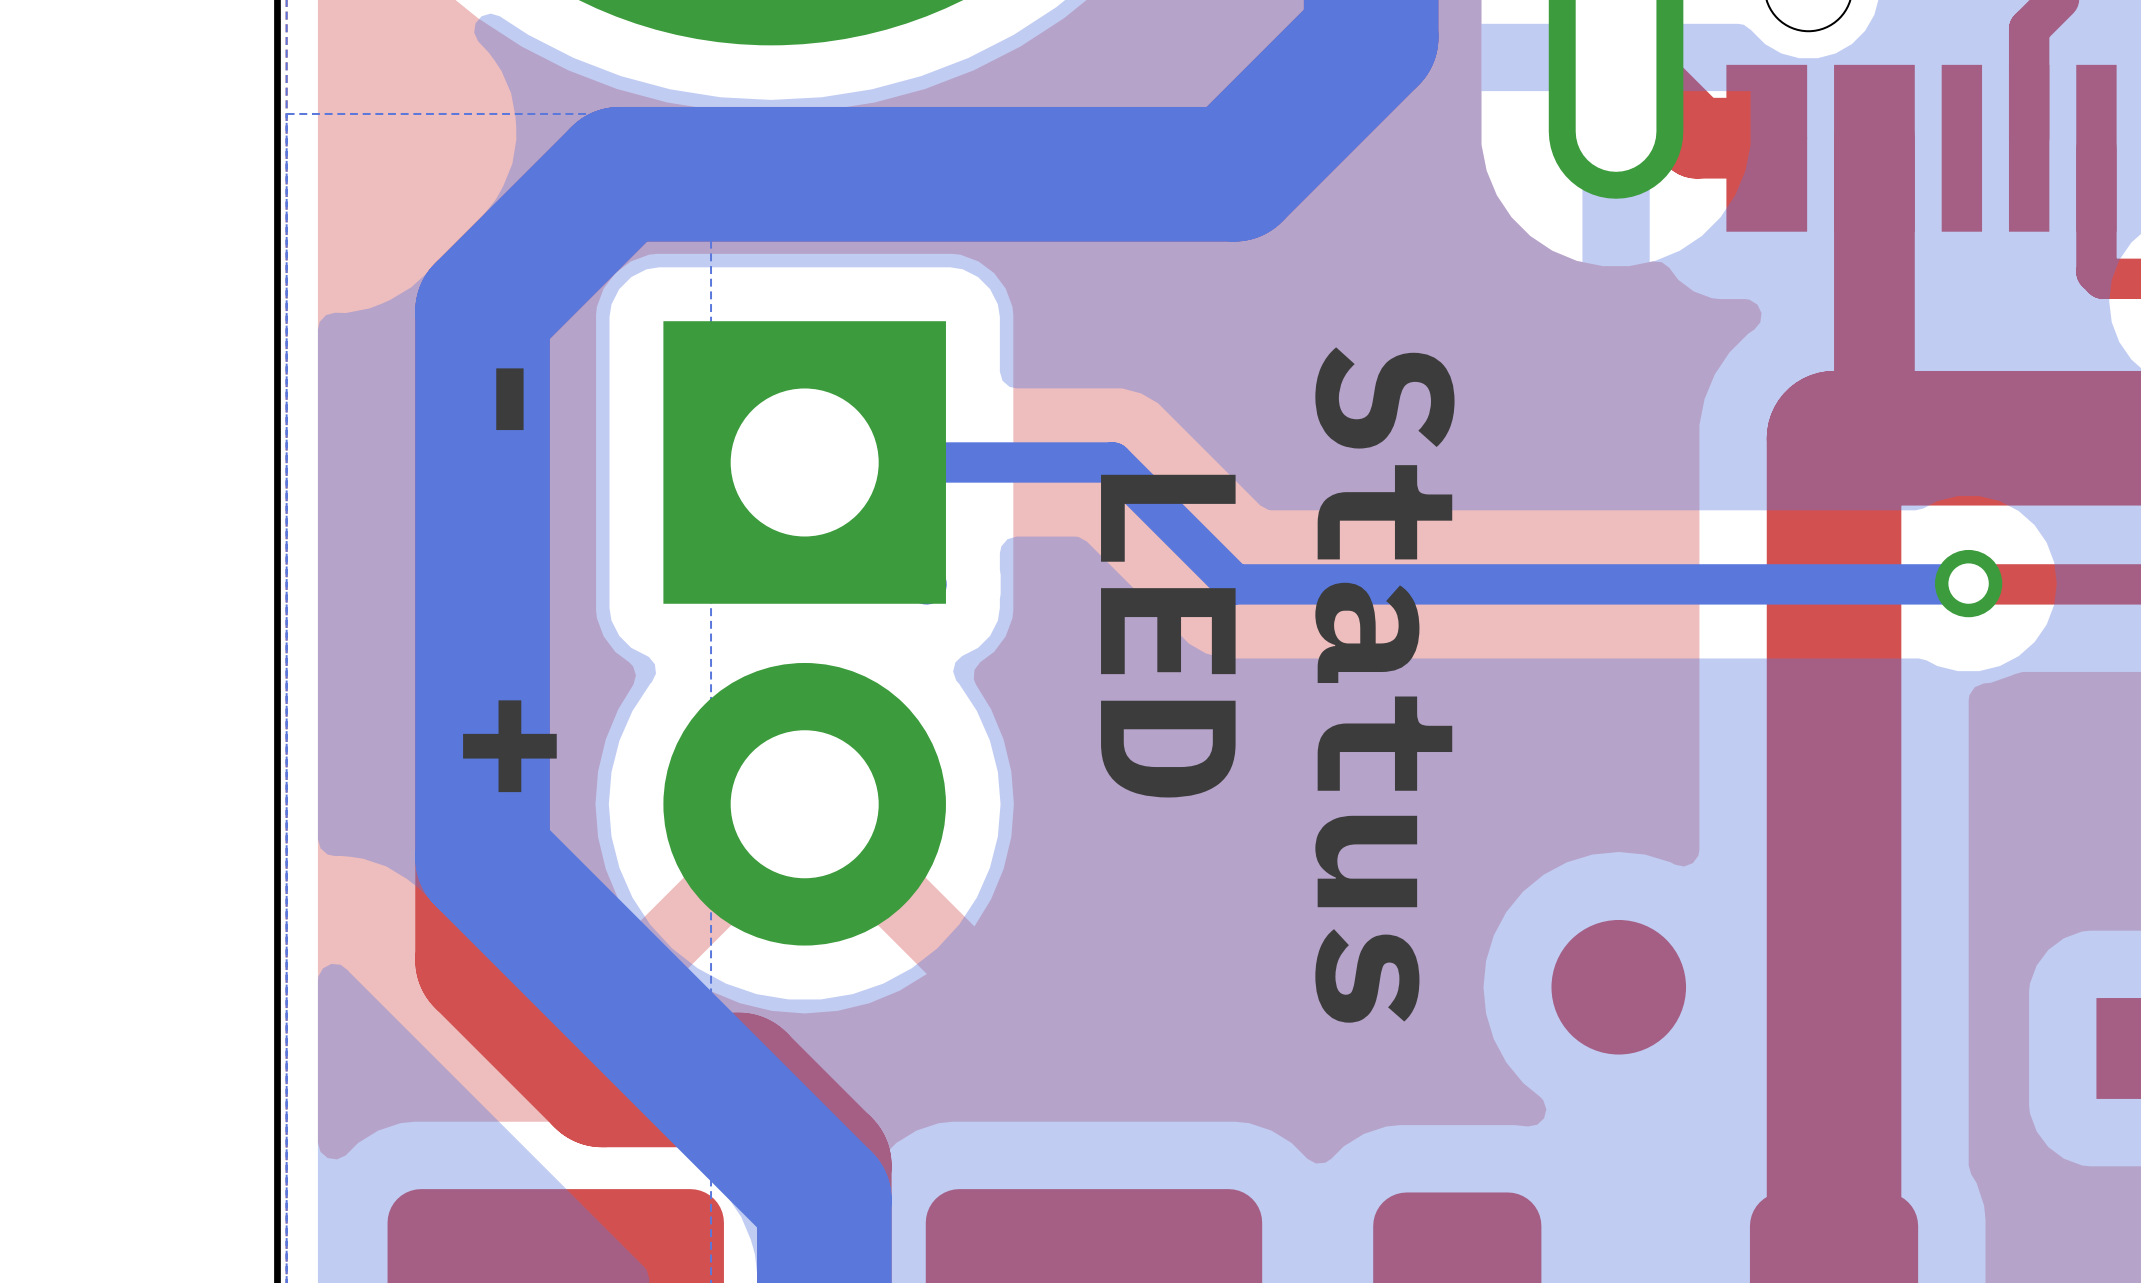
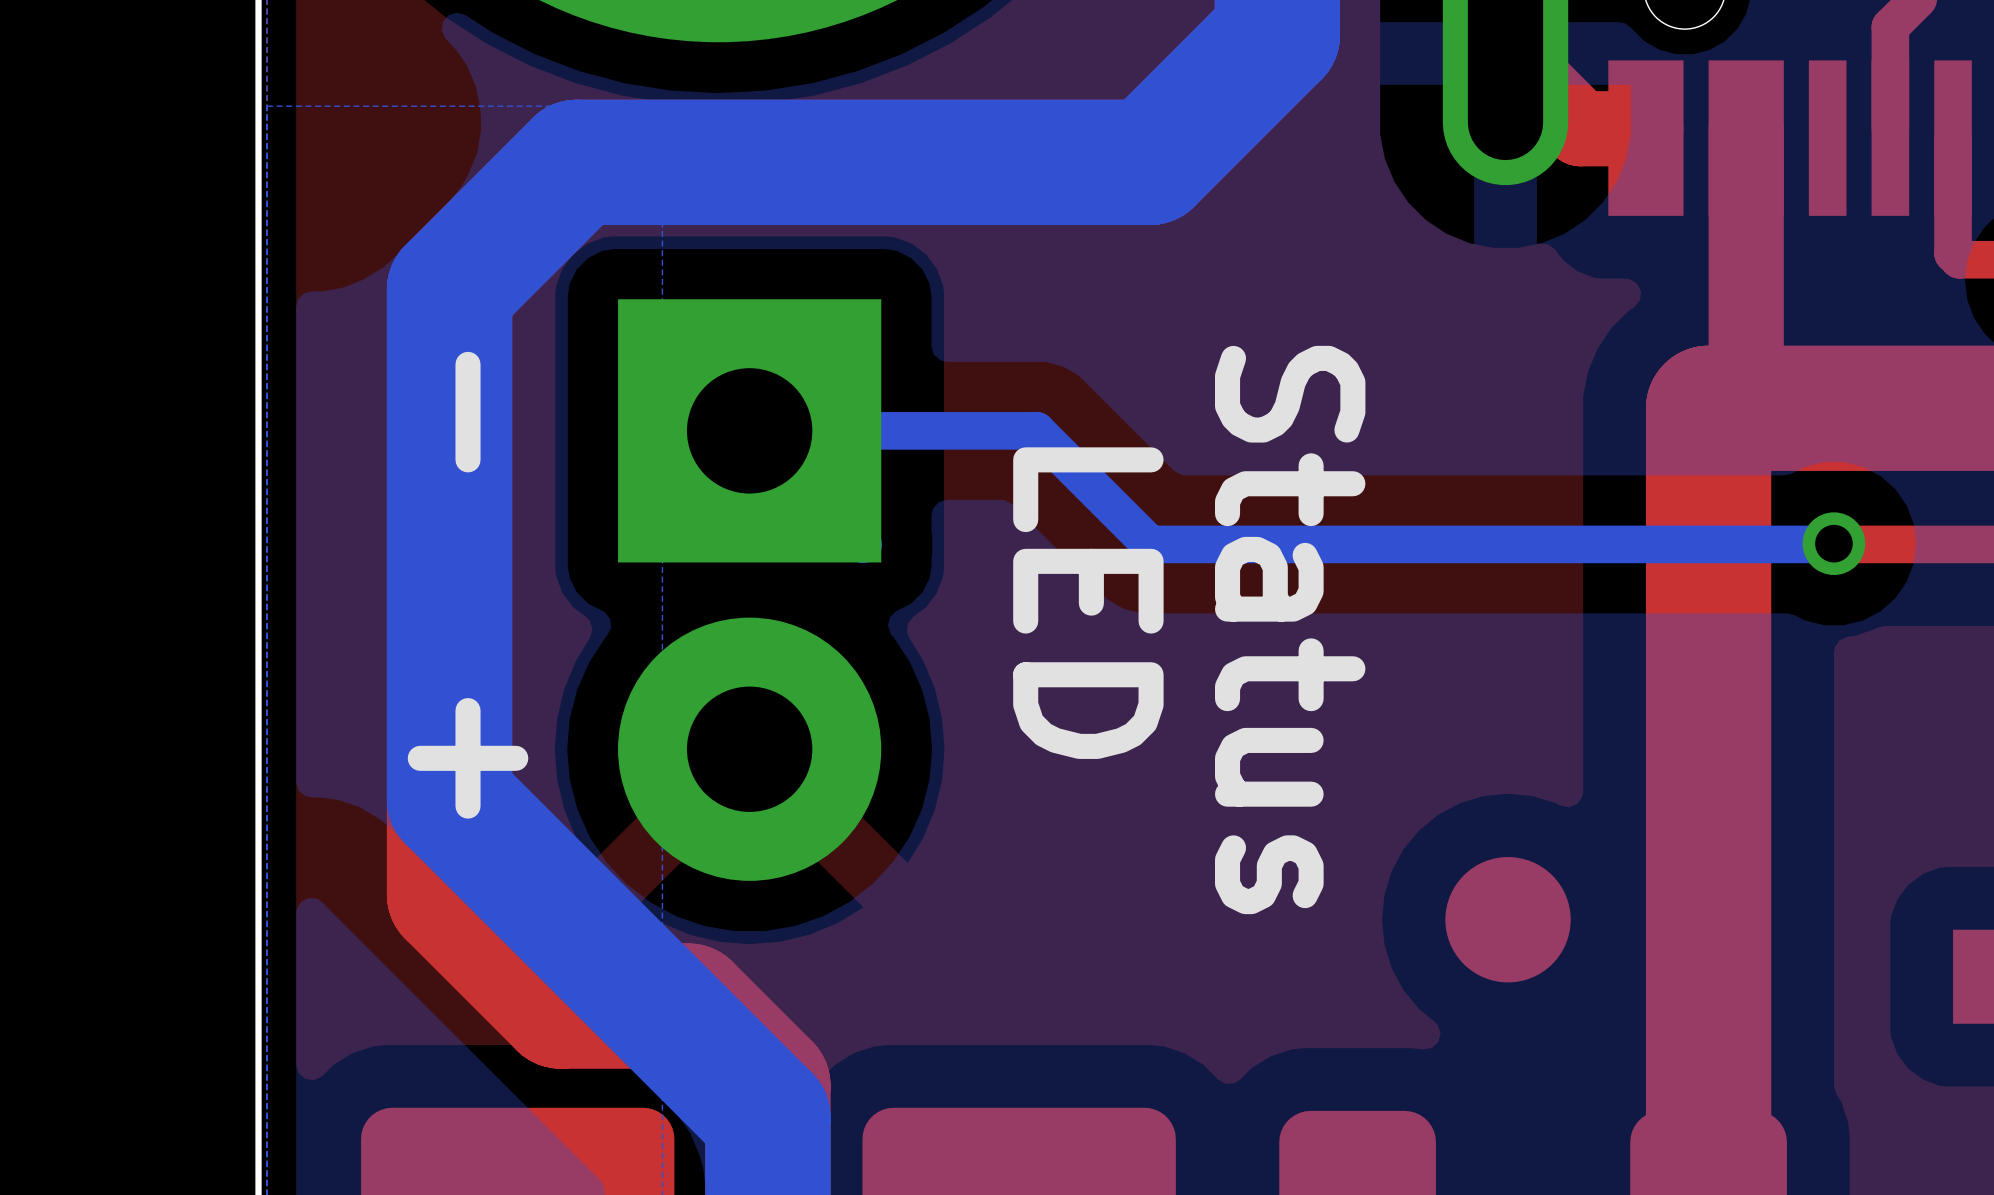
part footprint: [663, 321, 946, 946] -> [618, 299, 882, 881]

